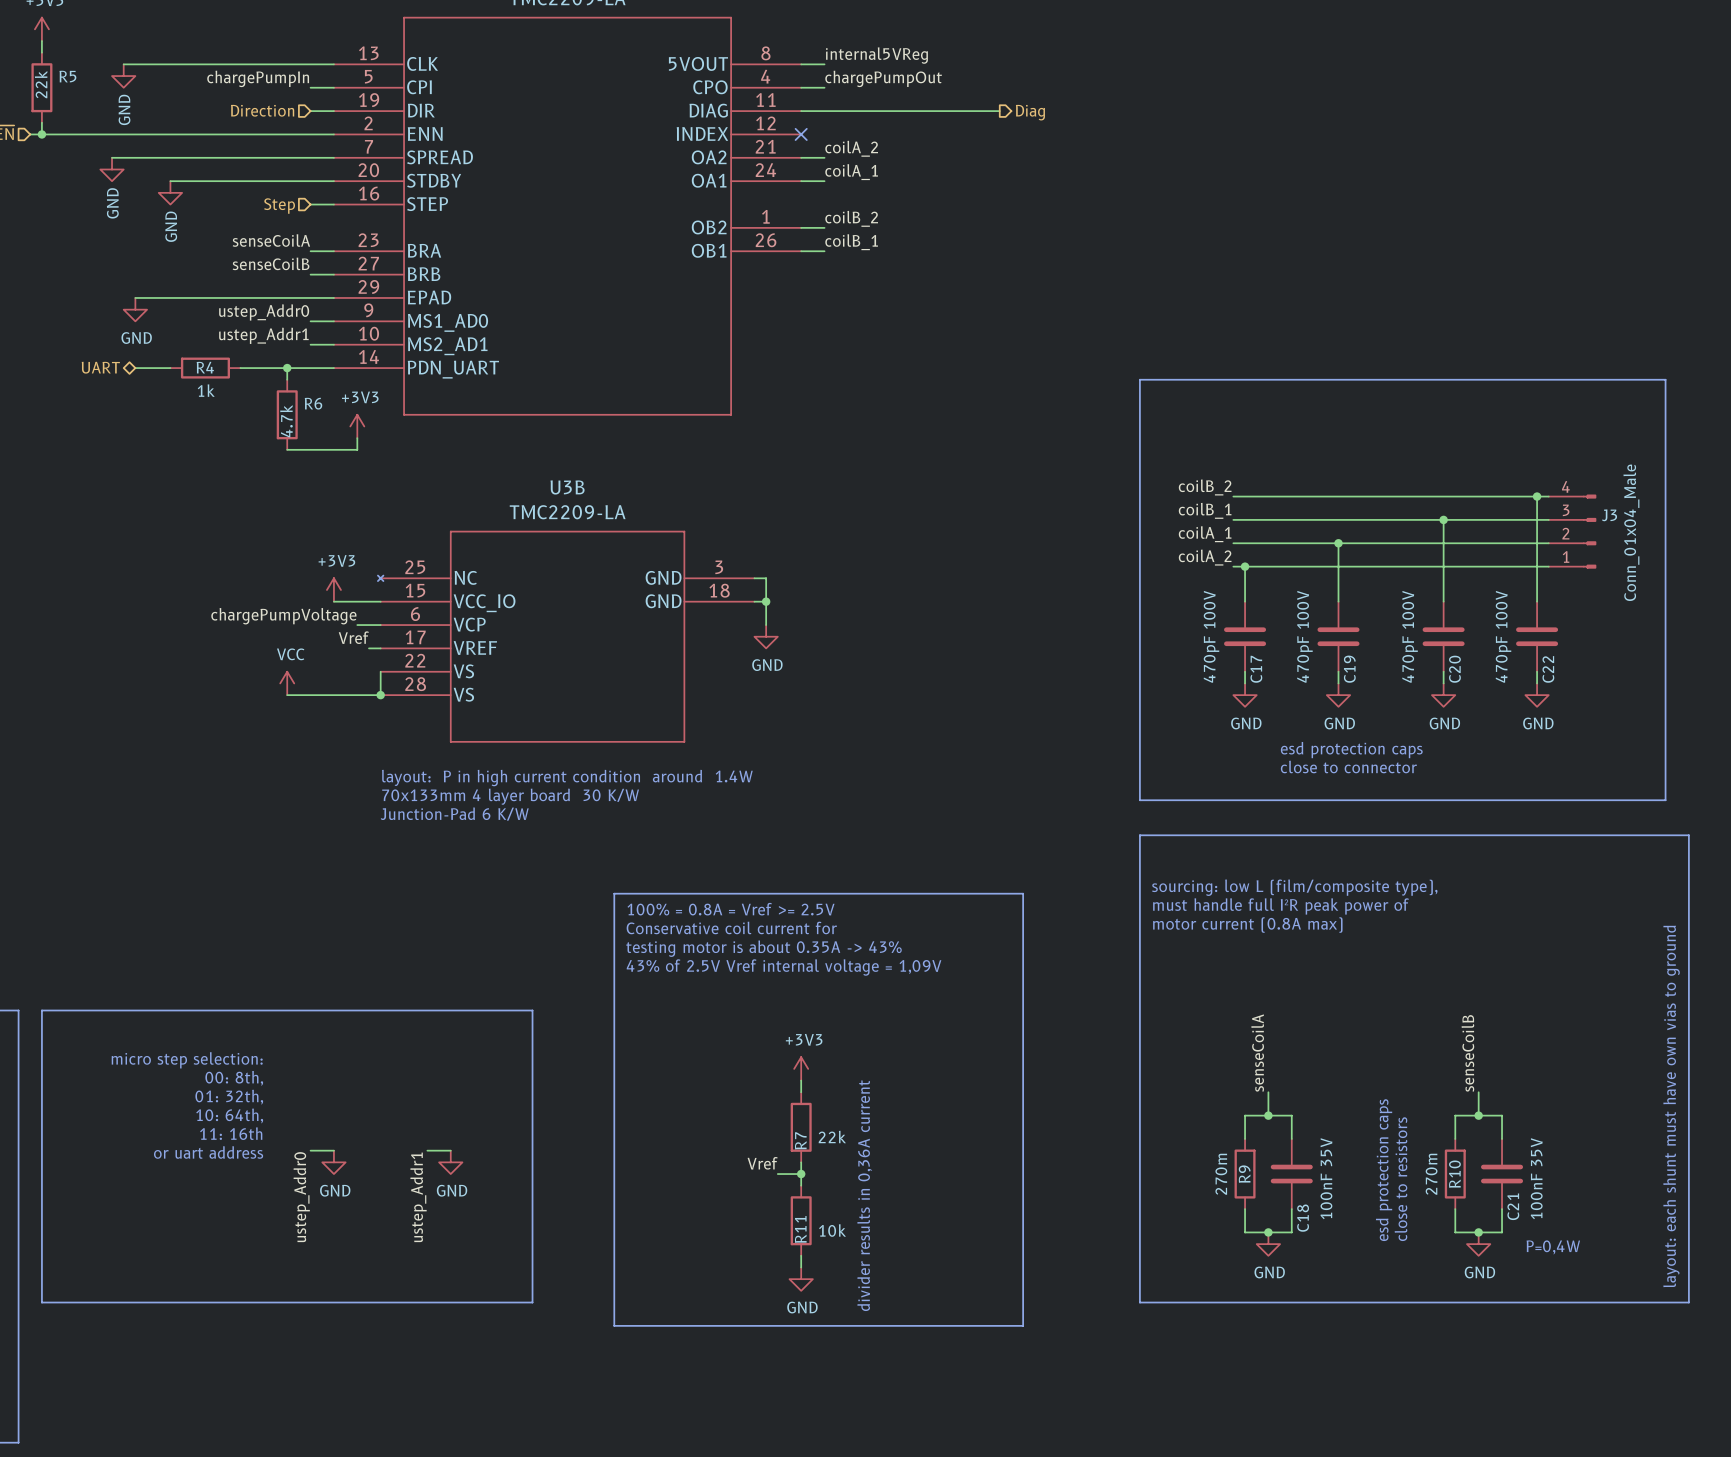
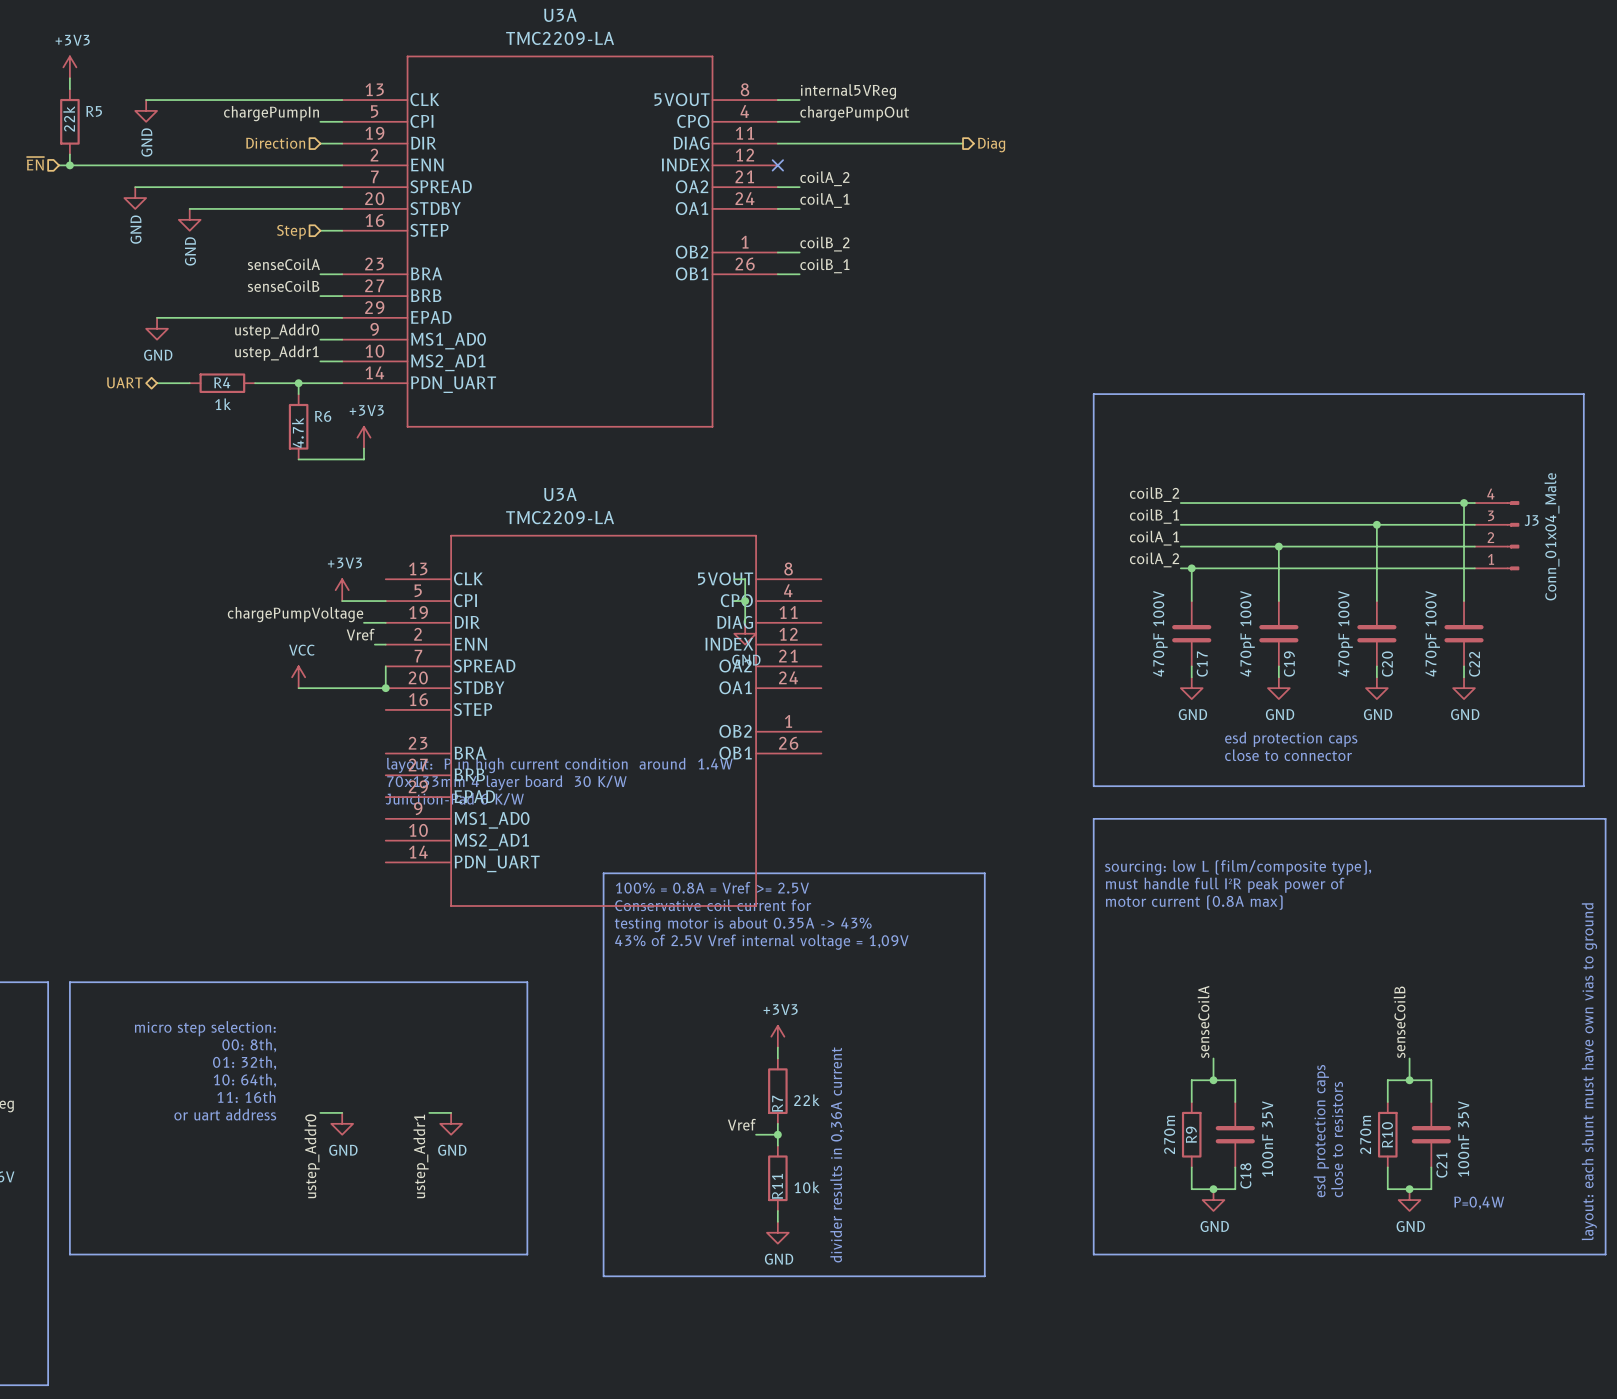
U3B: TMC2209-LA (566, 636) -> none
U3A: none -> TMC2209-LA (603, 720)

